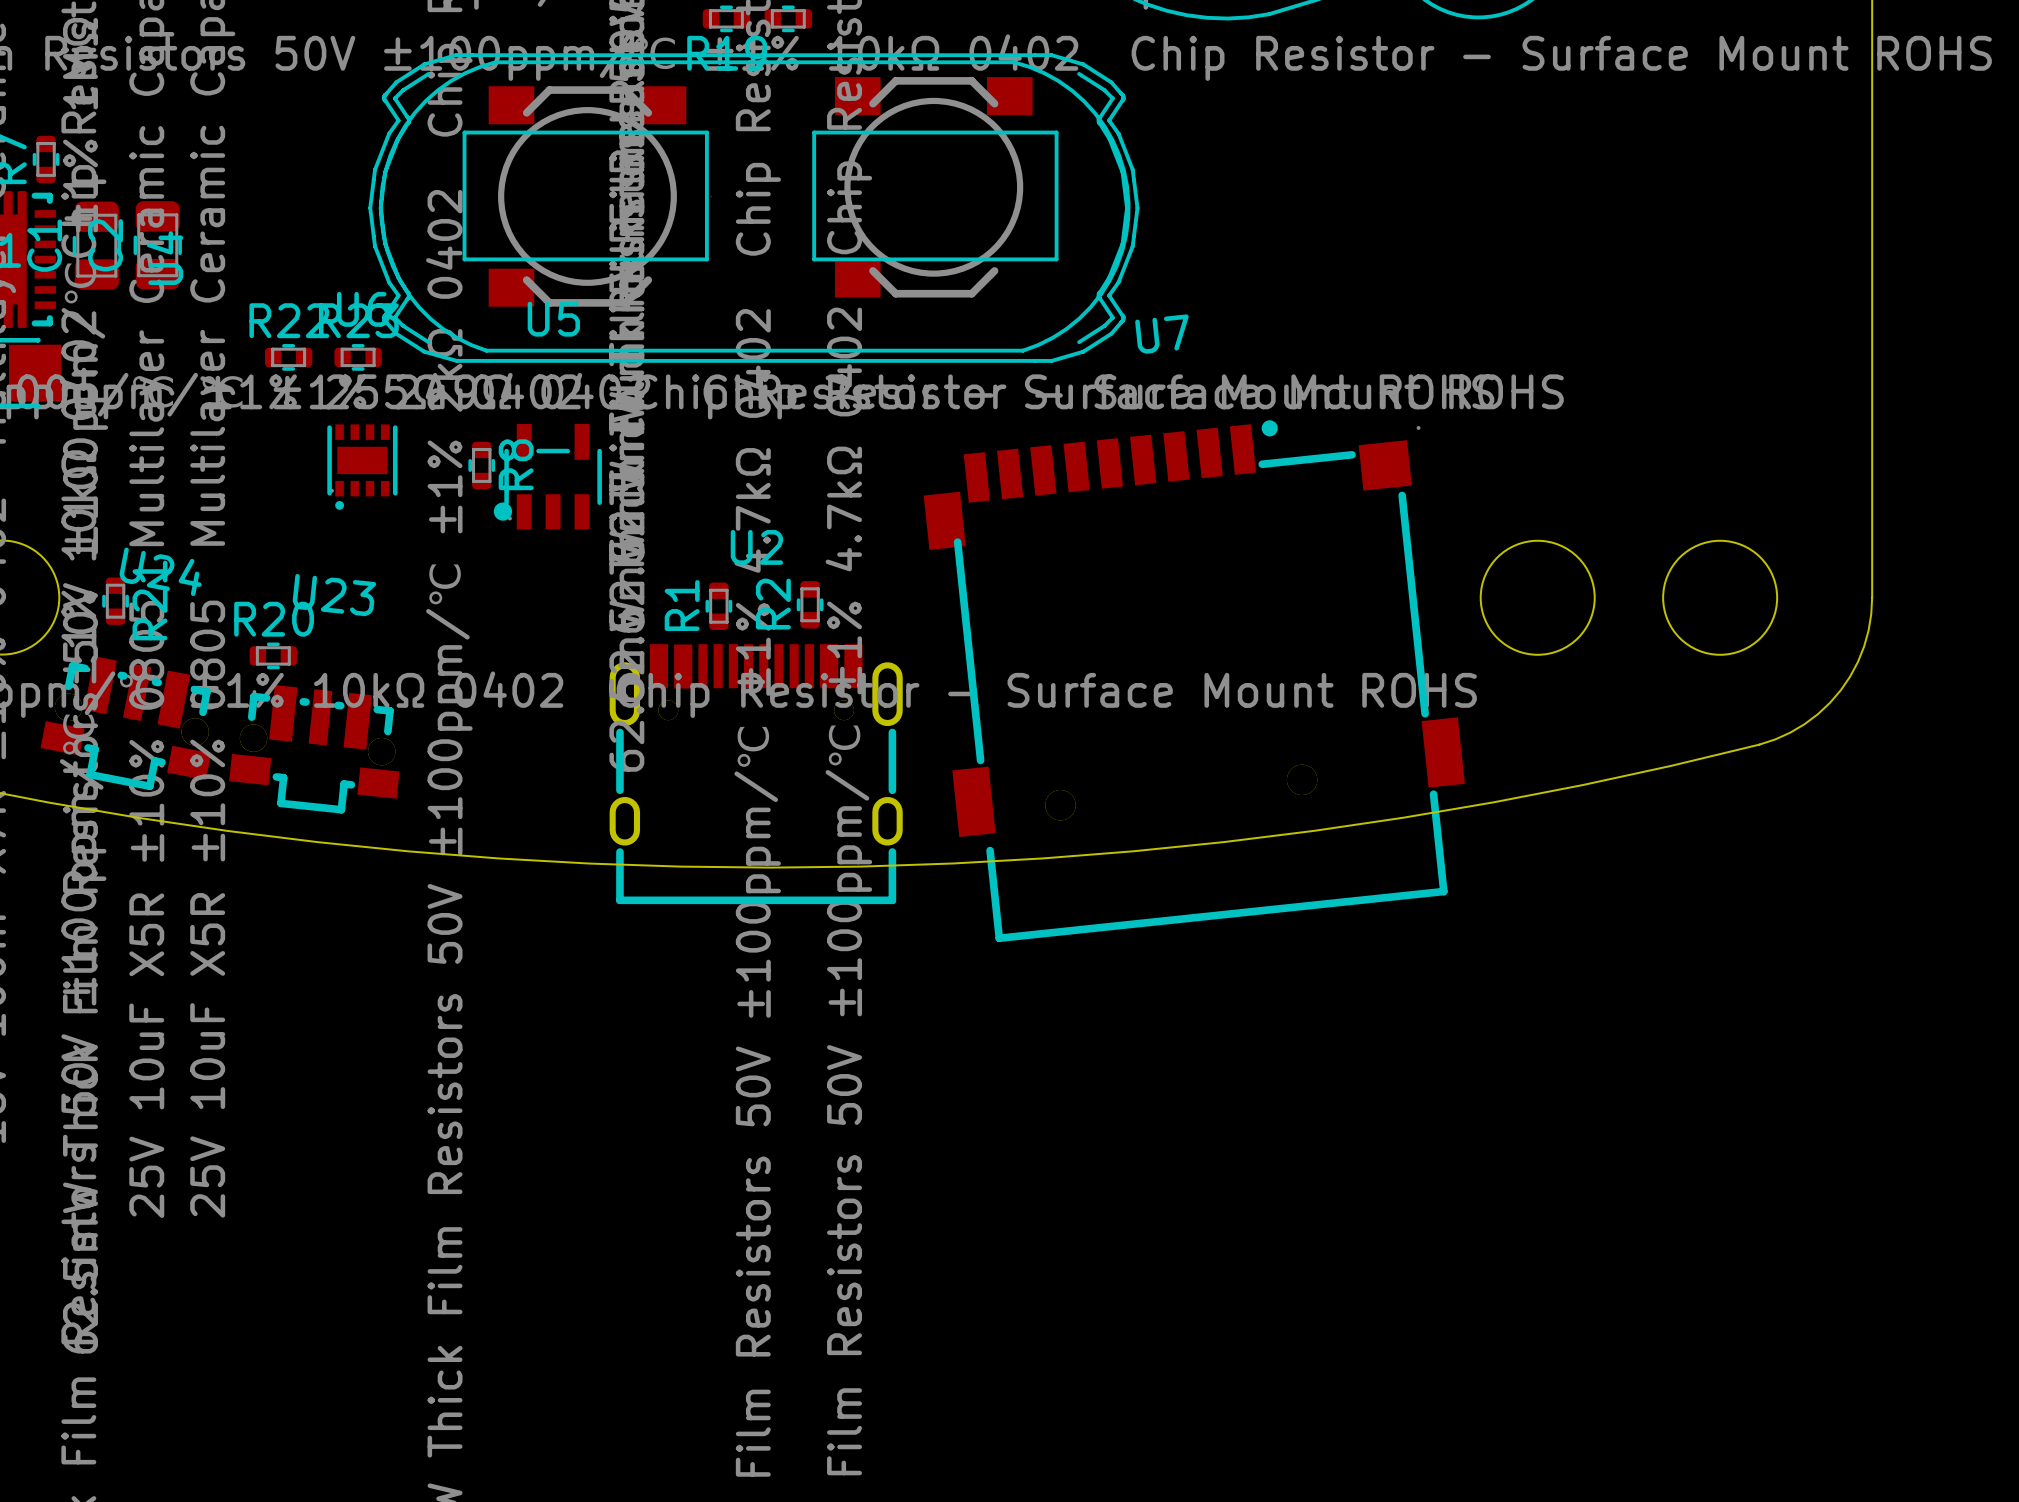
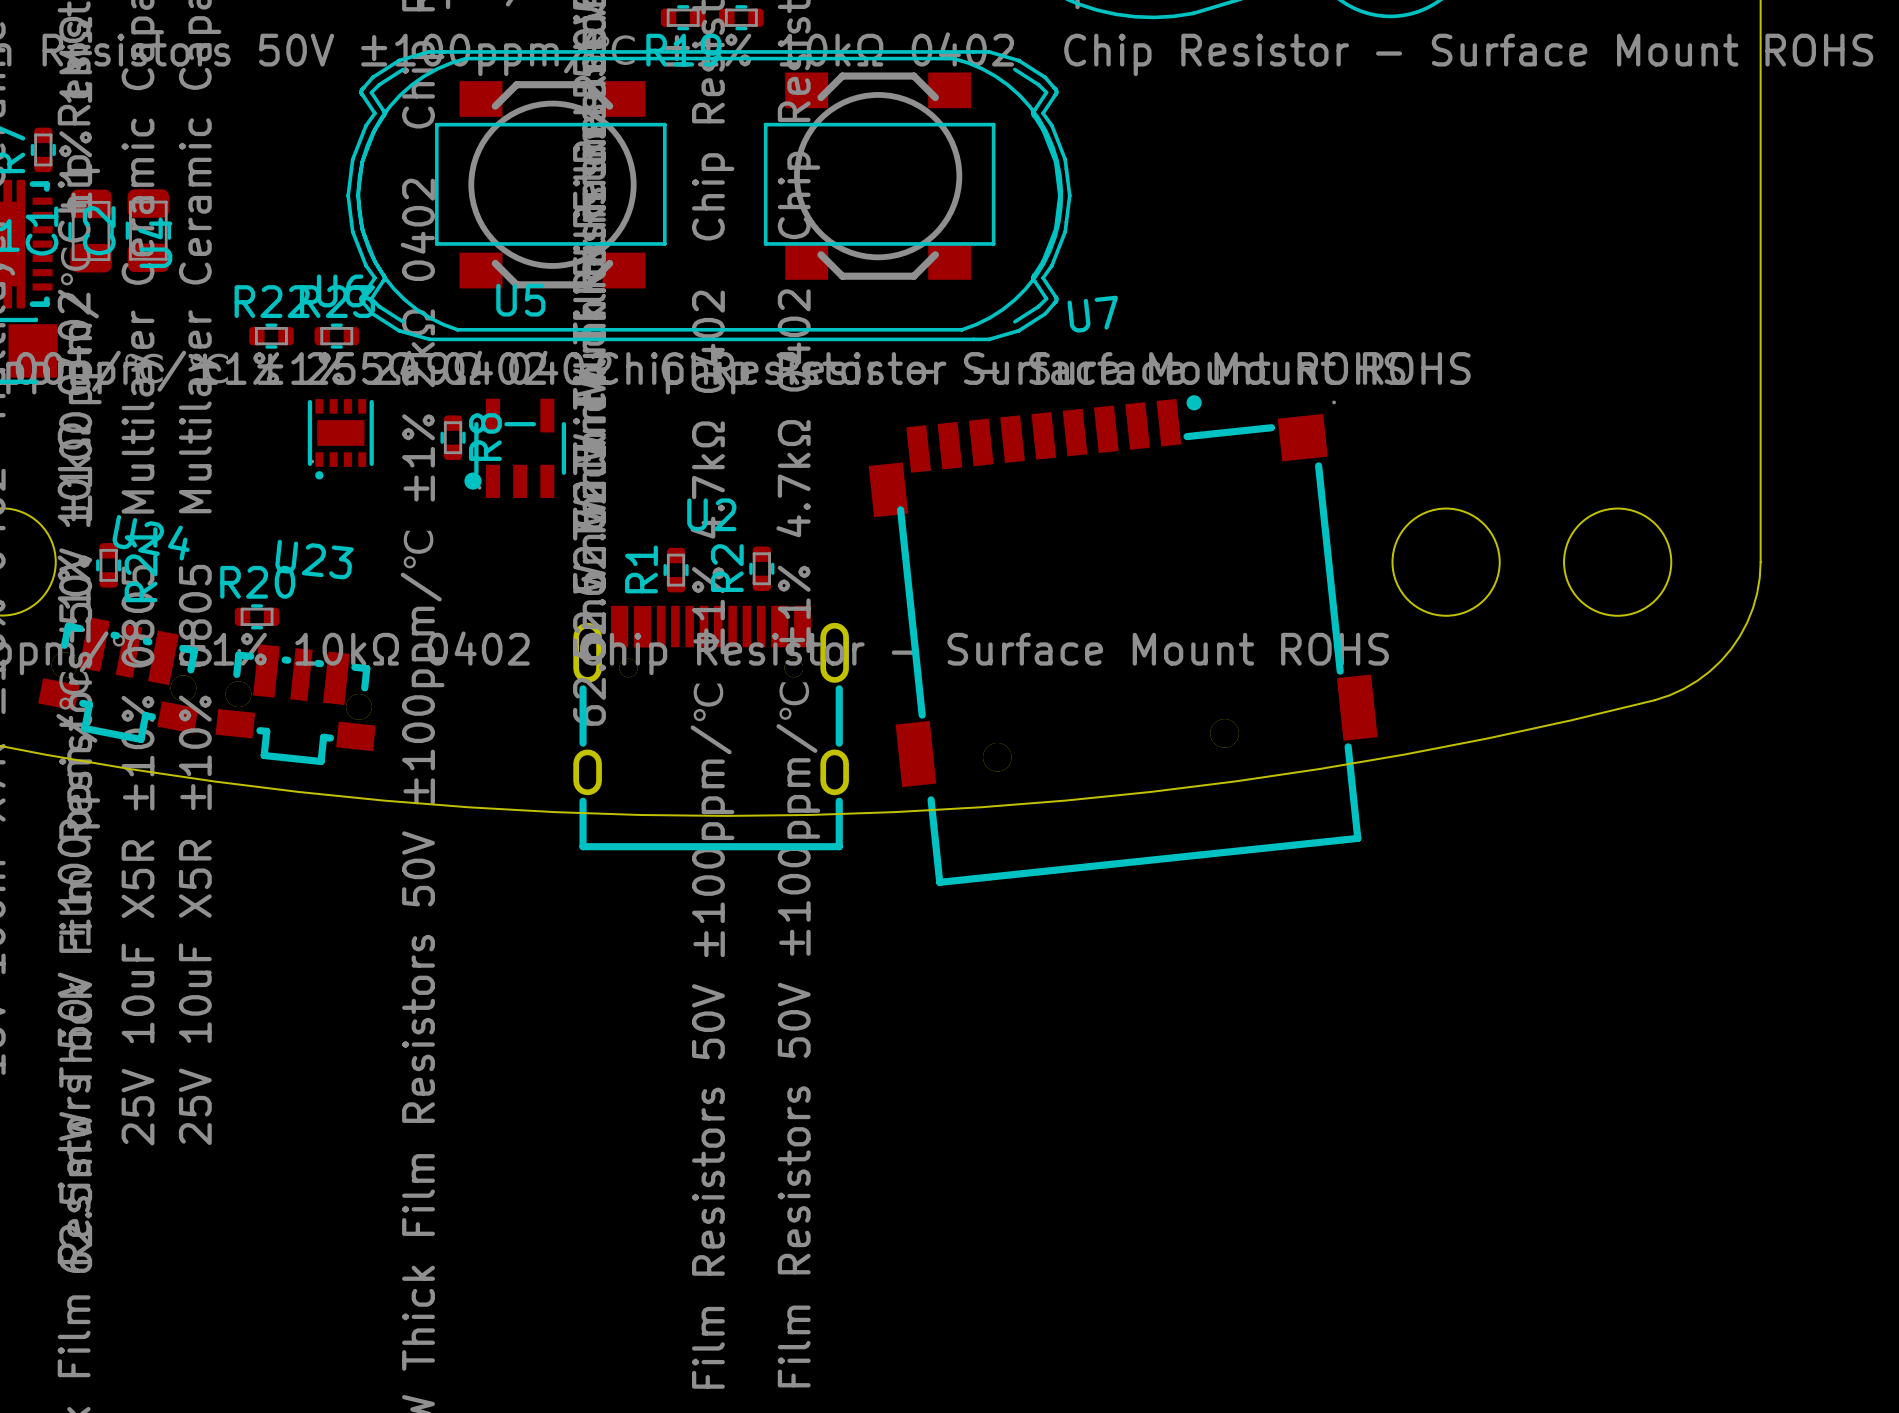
part footprint: [834, 77, 1059, 298] -> [785, 72, 972, 280]
part footprint: [488, 86, 712, 307] -> [459, 81, 646, 289]

